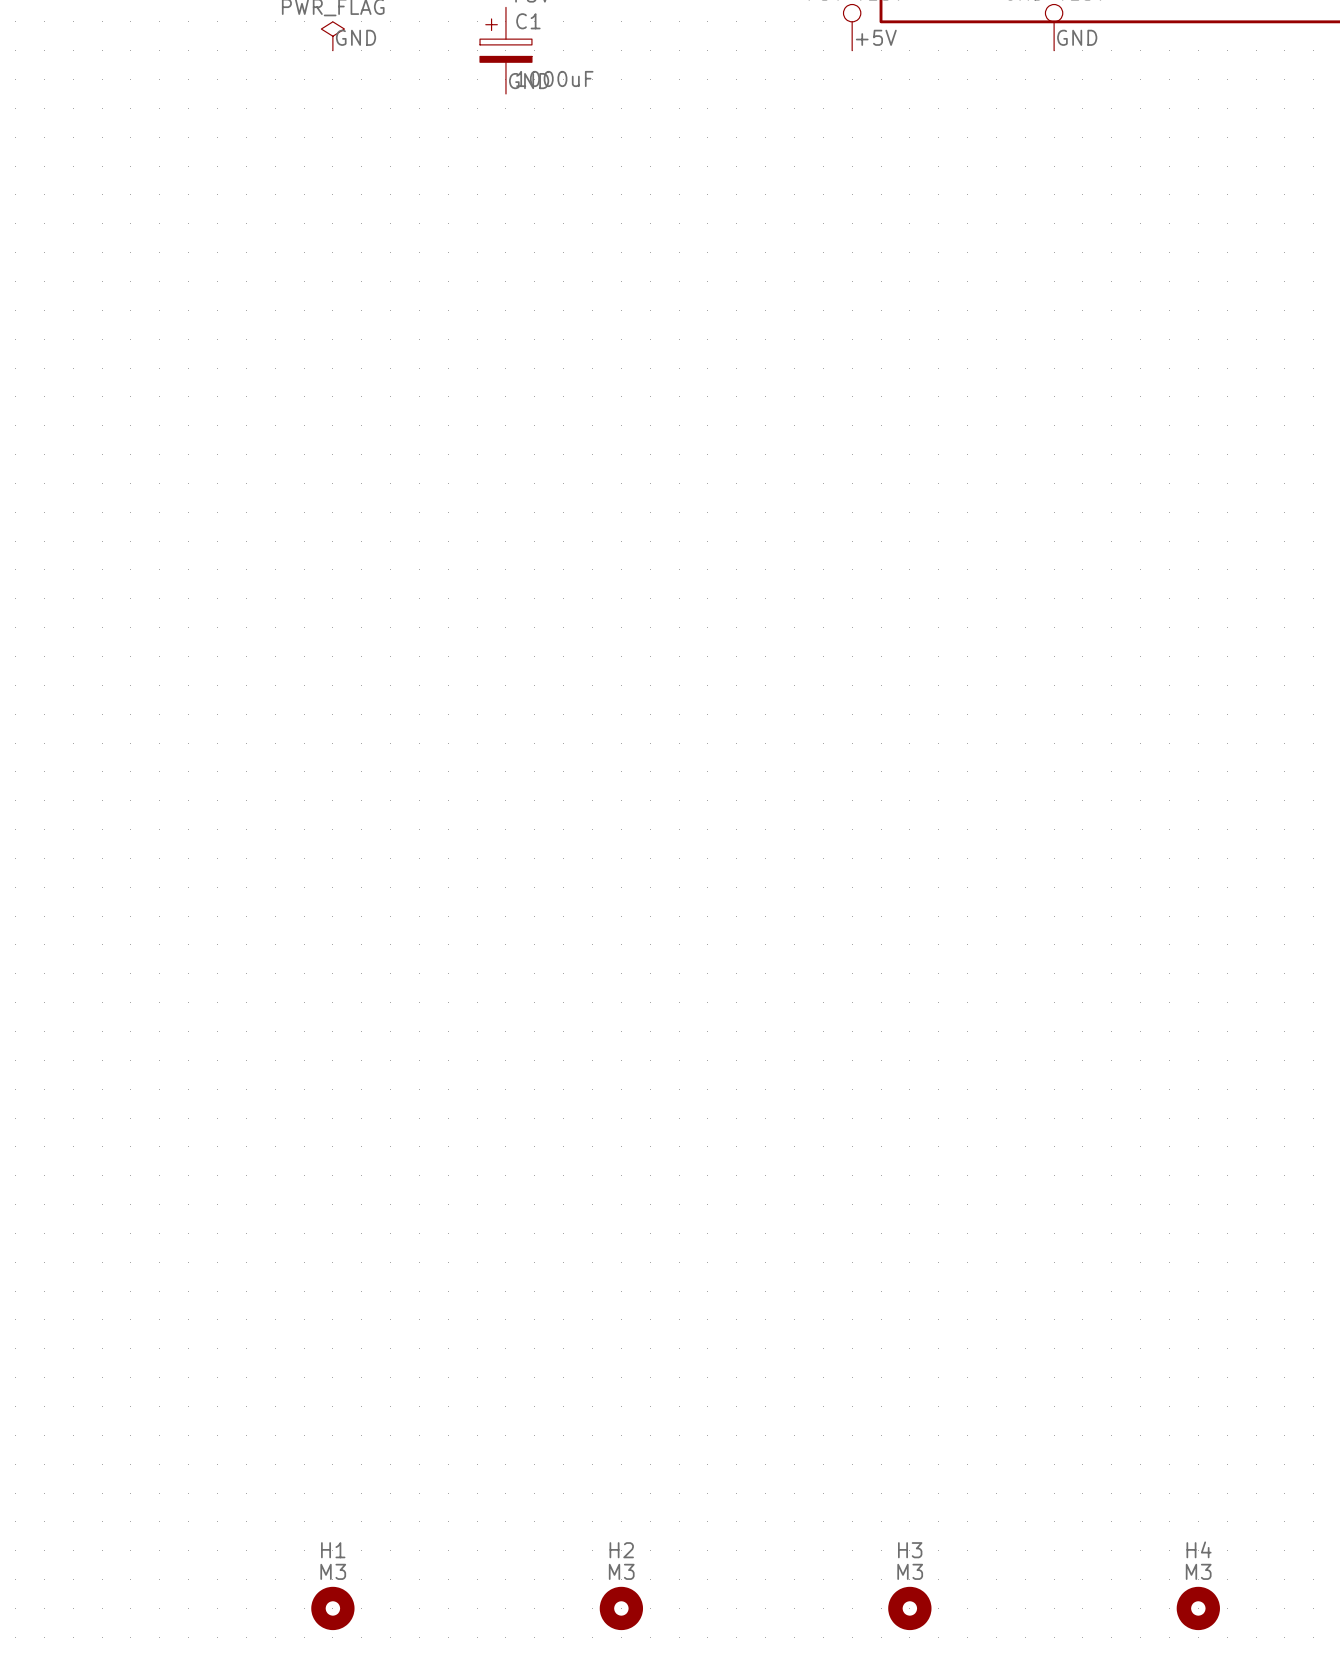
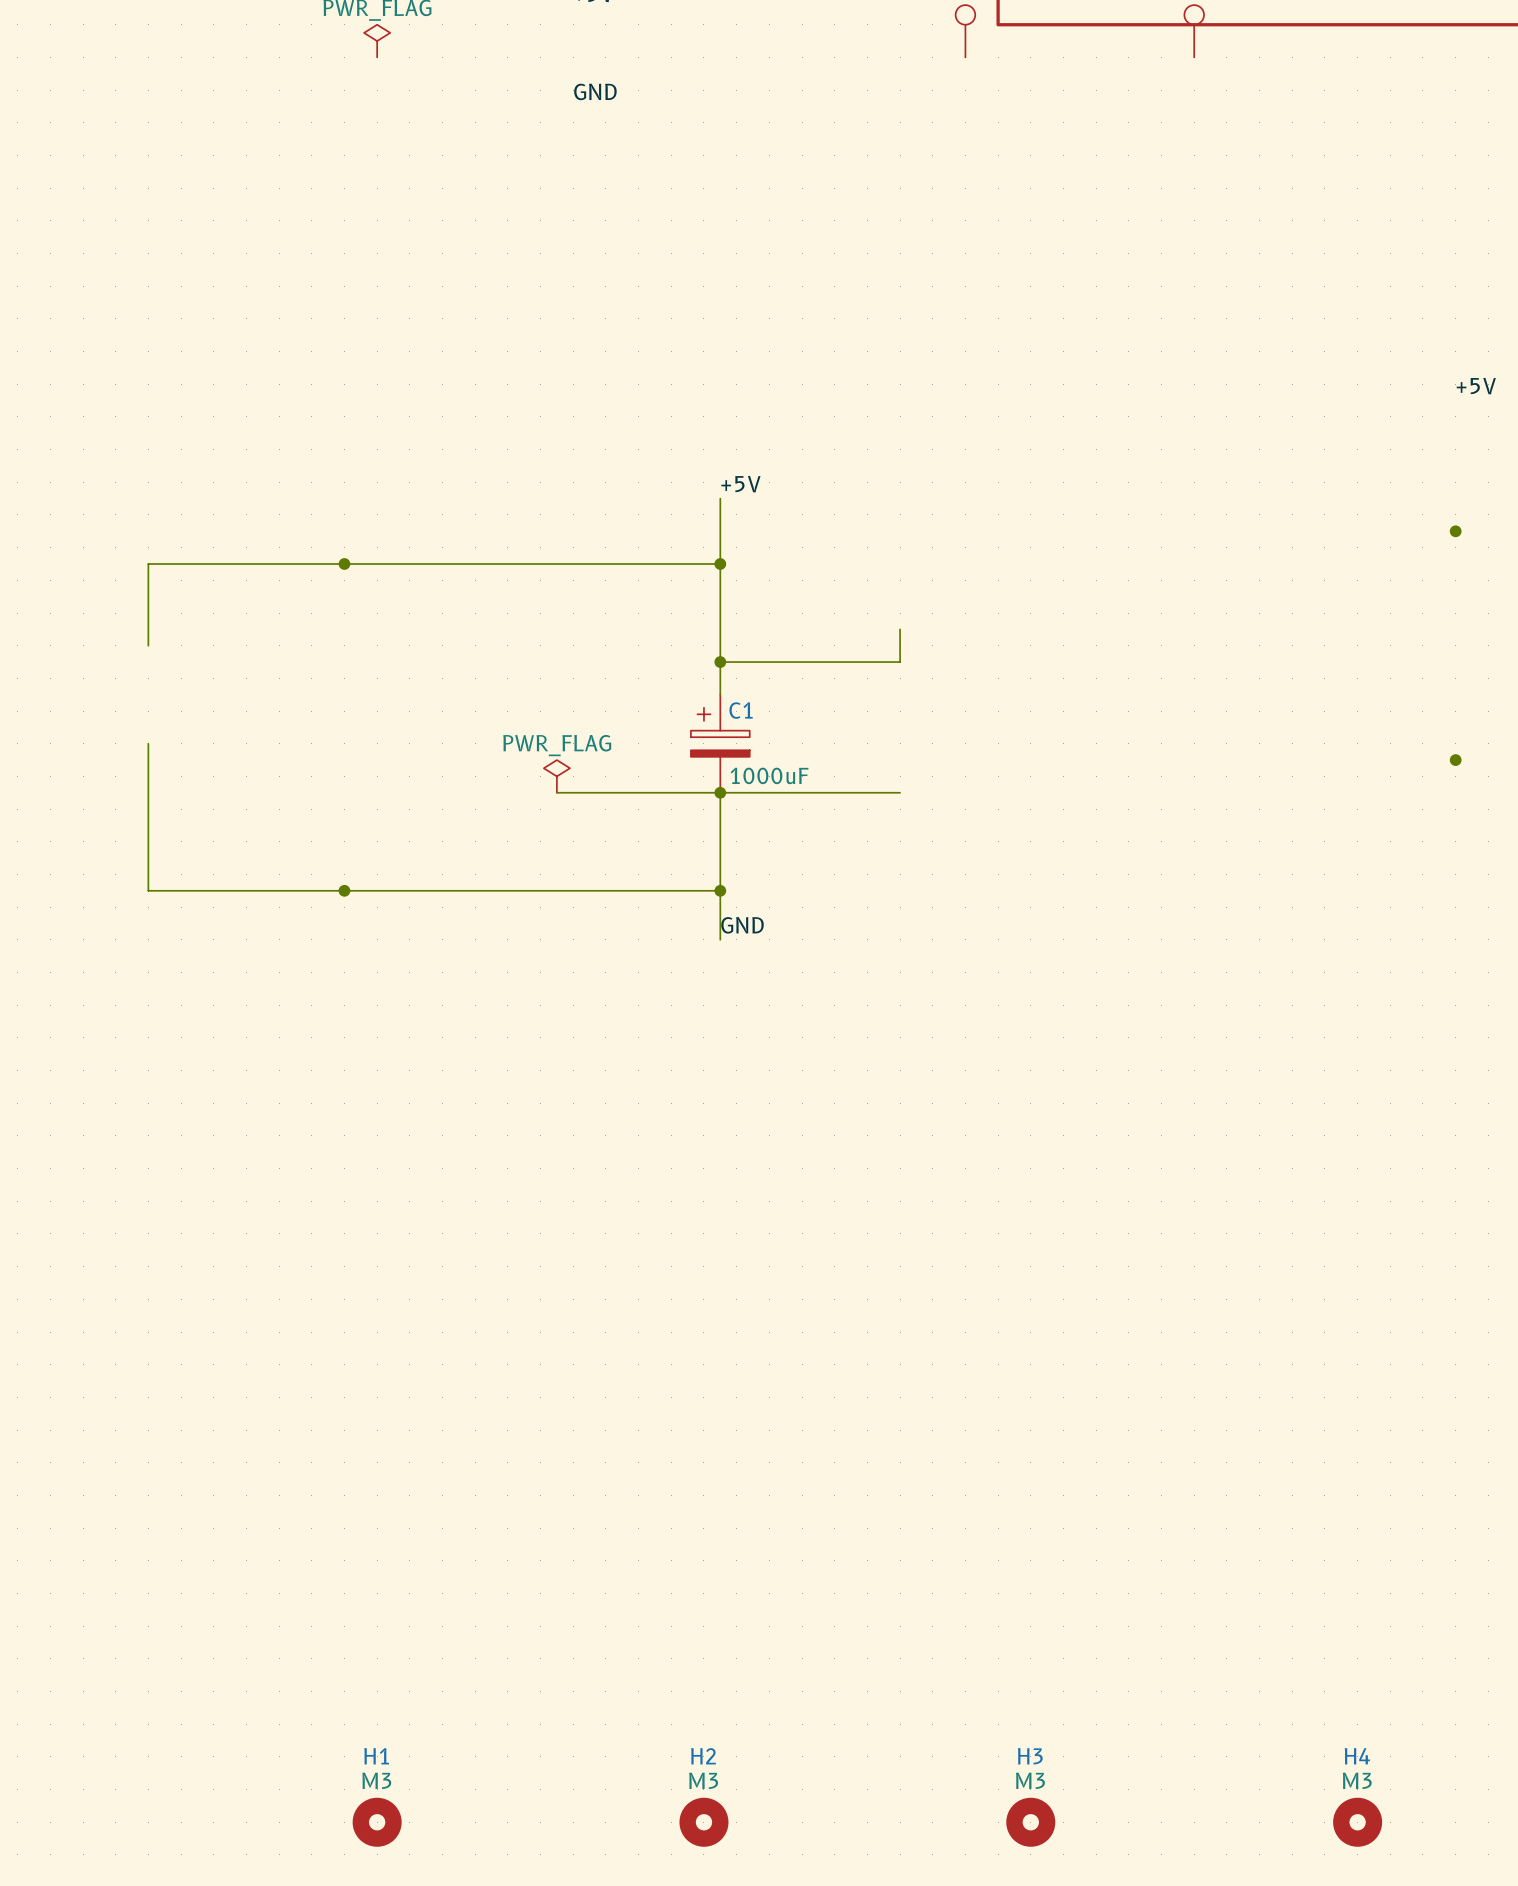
label: GND (356, 37) -> none
label: +5V (876, 37) -> none
label: GND (1077, 37) -> none
C1 position: (505, 50) -> (720, 743)
label: none -> +5V (1476, 386)
label: none -> +5V (740, 484)
wire: none -> (720, 498) (720, 694)
junction: none -> (1455, 531)
junction: none -> (344, 563)
wire: none -> (720, 563) (148, 563) (148, 645)
junction: none -> (720, 563)
wire: none -> (900, 629) (900, 662) (720, 662)
junction: none -> (720, 662)
wire: none -> (148, 743) (148, 890) (720, 890)
junction: none -> (1455, 760)
power symbol: none -> PWR_FLAG (556, 776)
wire: none -> (556, 792) (900, 792)
wire: none -> (720, 792) (720, 939)
junction: none -> (720, 792)
junction: none -> (344, 890)
junction: none -> (720, 890)
label: none -> GND (742, 925)

